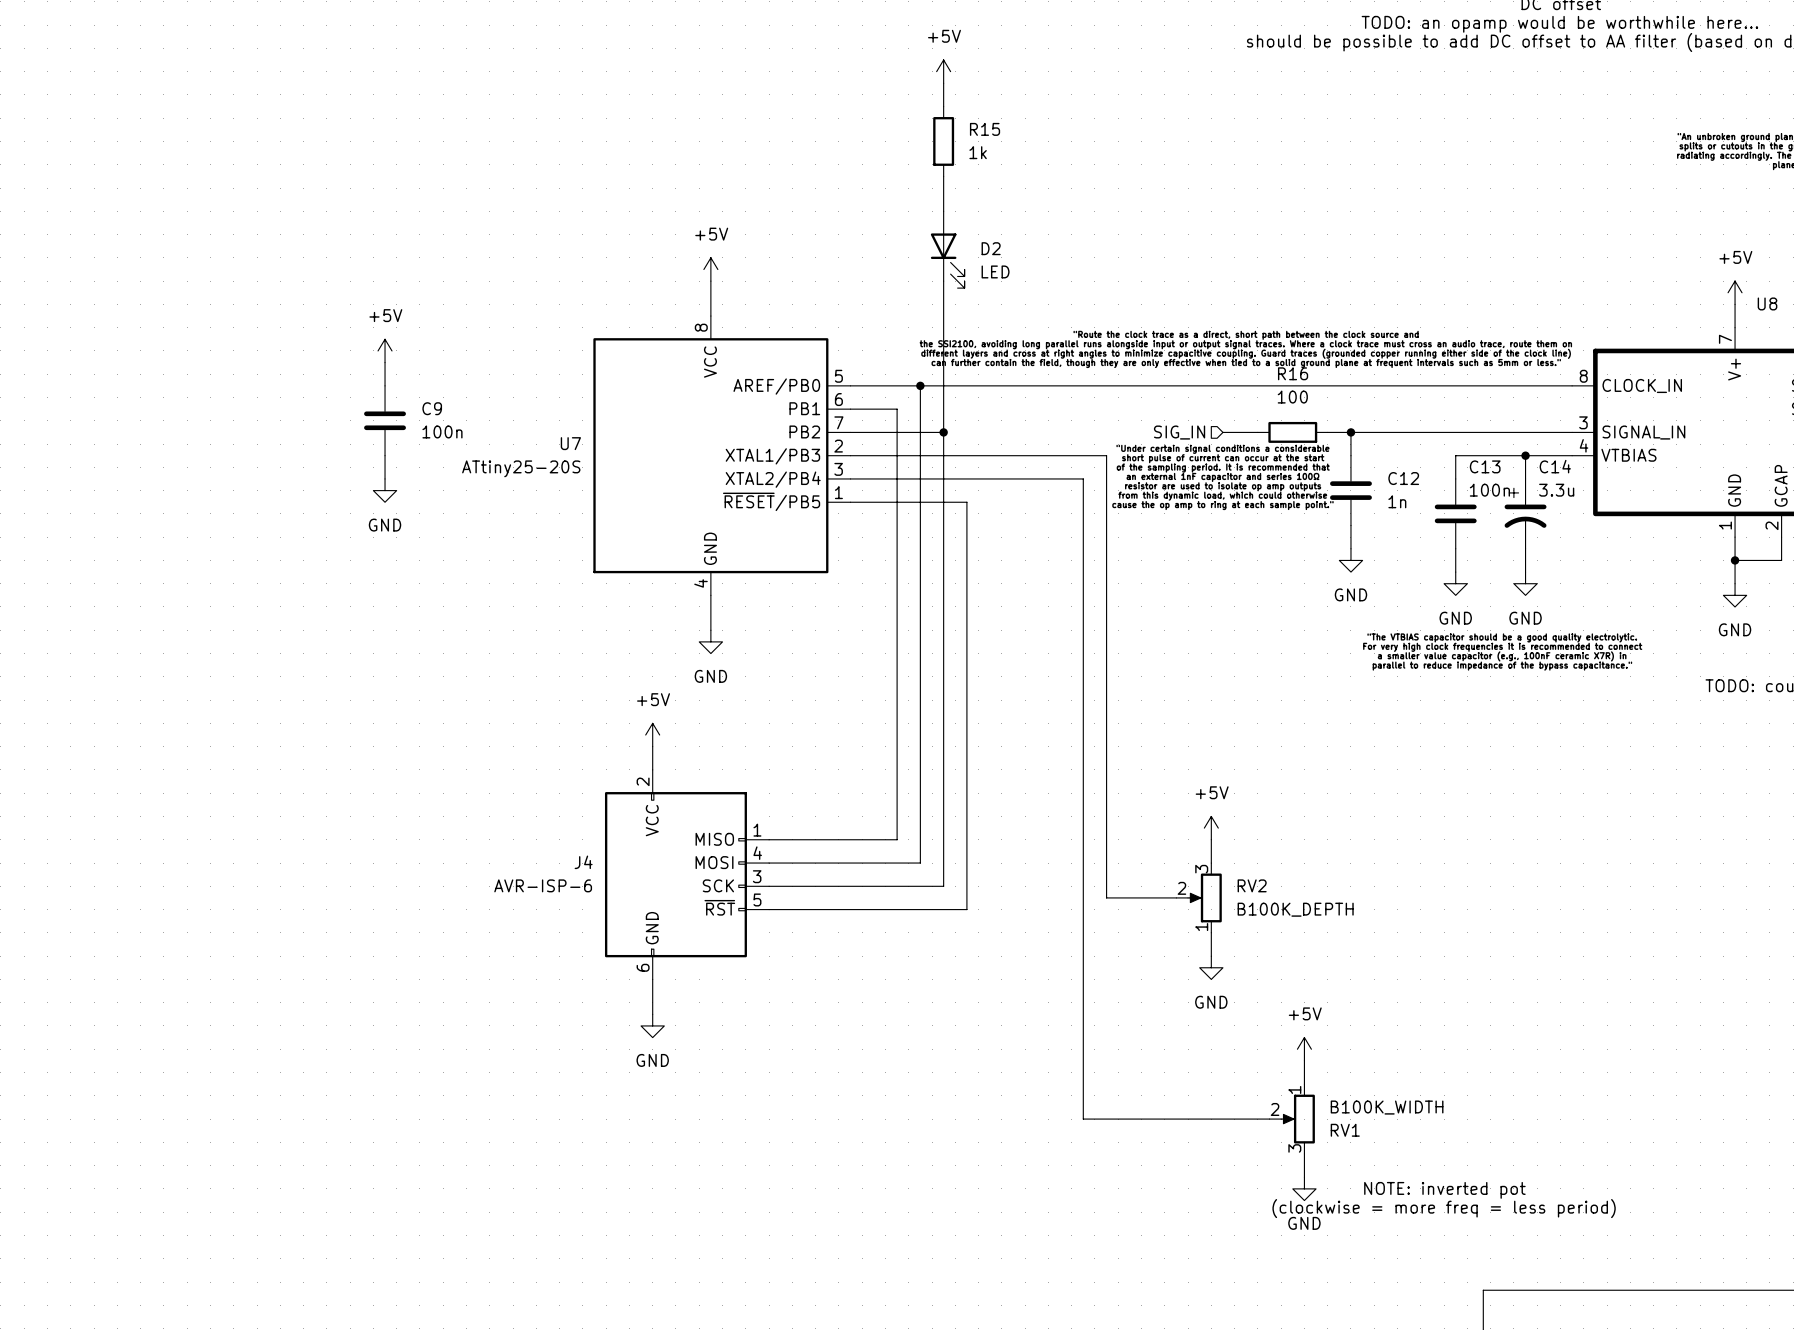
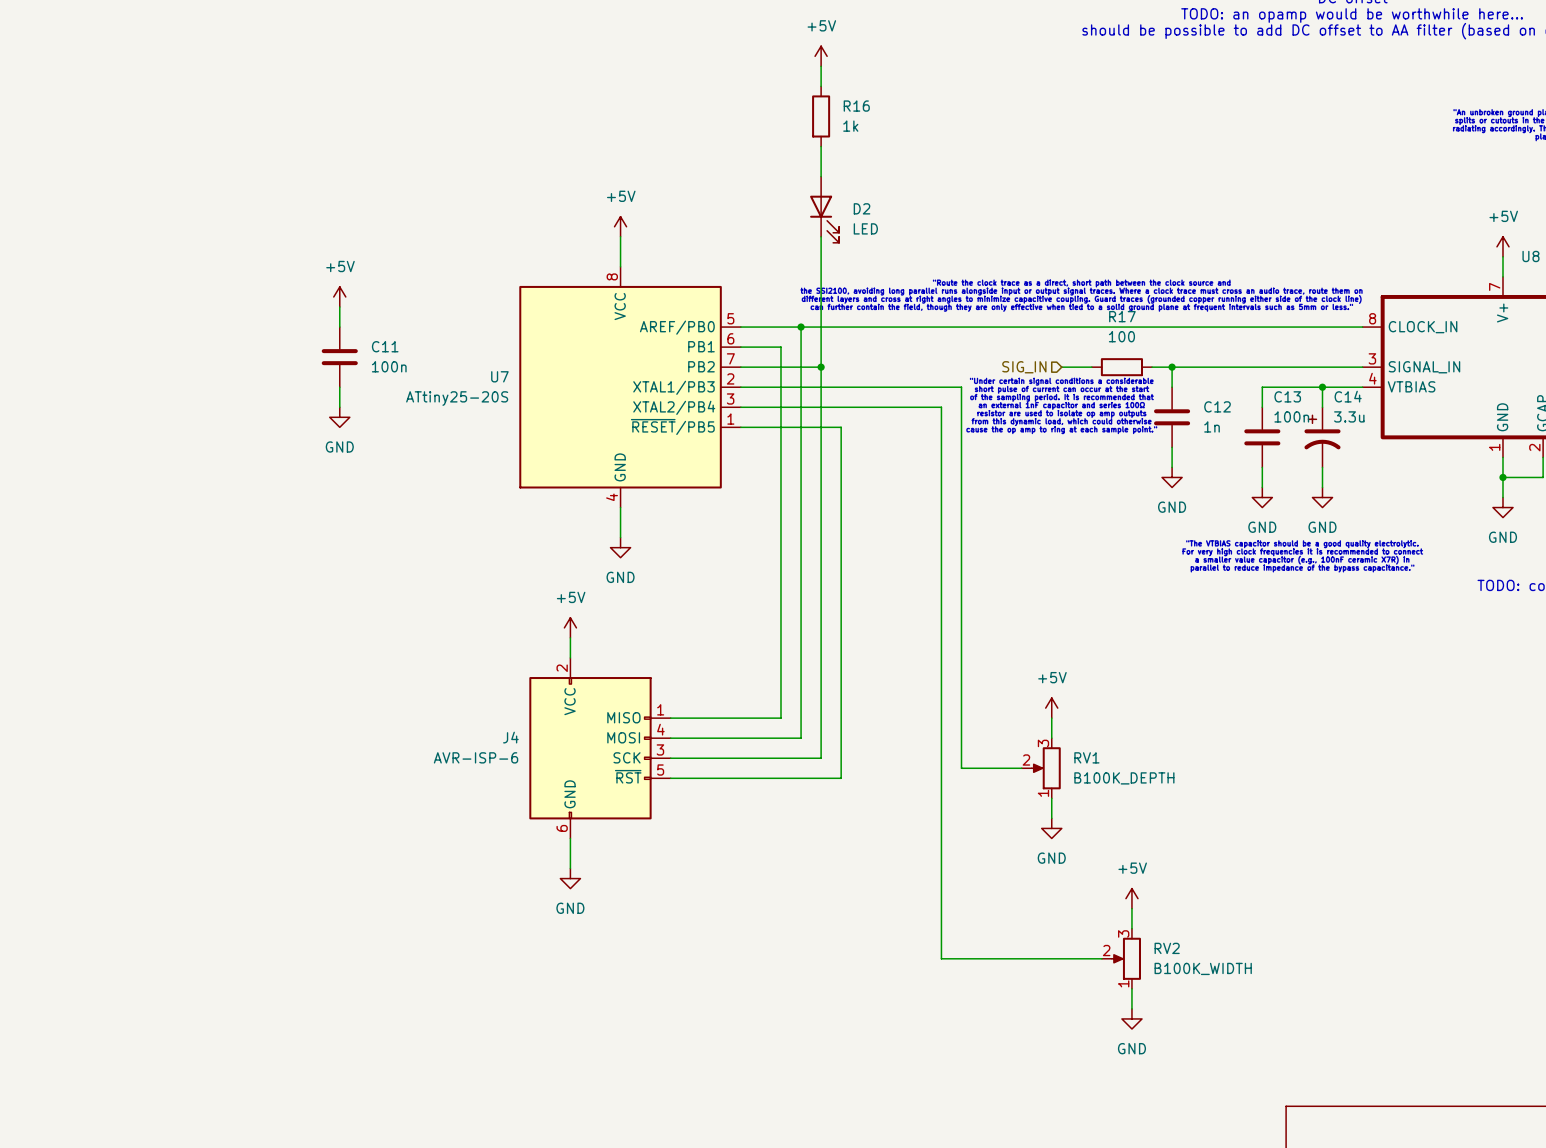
R15 name: R15 (985, 129) -> R16 (856, 106)
R16 name: R16 (1293, 373) -> R17 (1122, 316)
C9 name: C9 (432, 408) -> C11 (385, 346)
RV2 name: RV2 (1252, 885) -> RV1 (1086, 757)
RV1 flip: as is (1298, 1119) -> up-down (1126, 958)
RV1 name: RV1 (1345, 1130) -> RV2 (1167, 948)
text: NOTE: inverted pot (1444, 1190) -> none
text: (clockwise = more freq = less period) (1444, 1208) -> none

